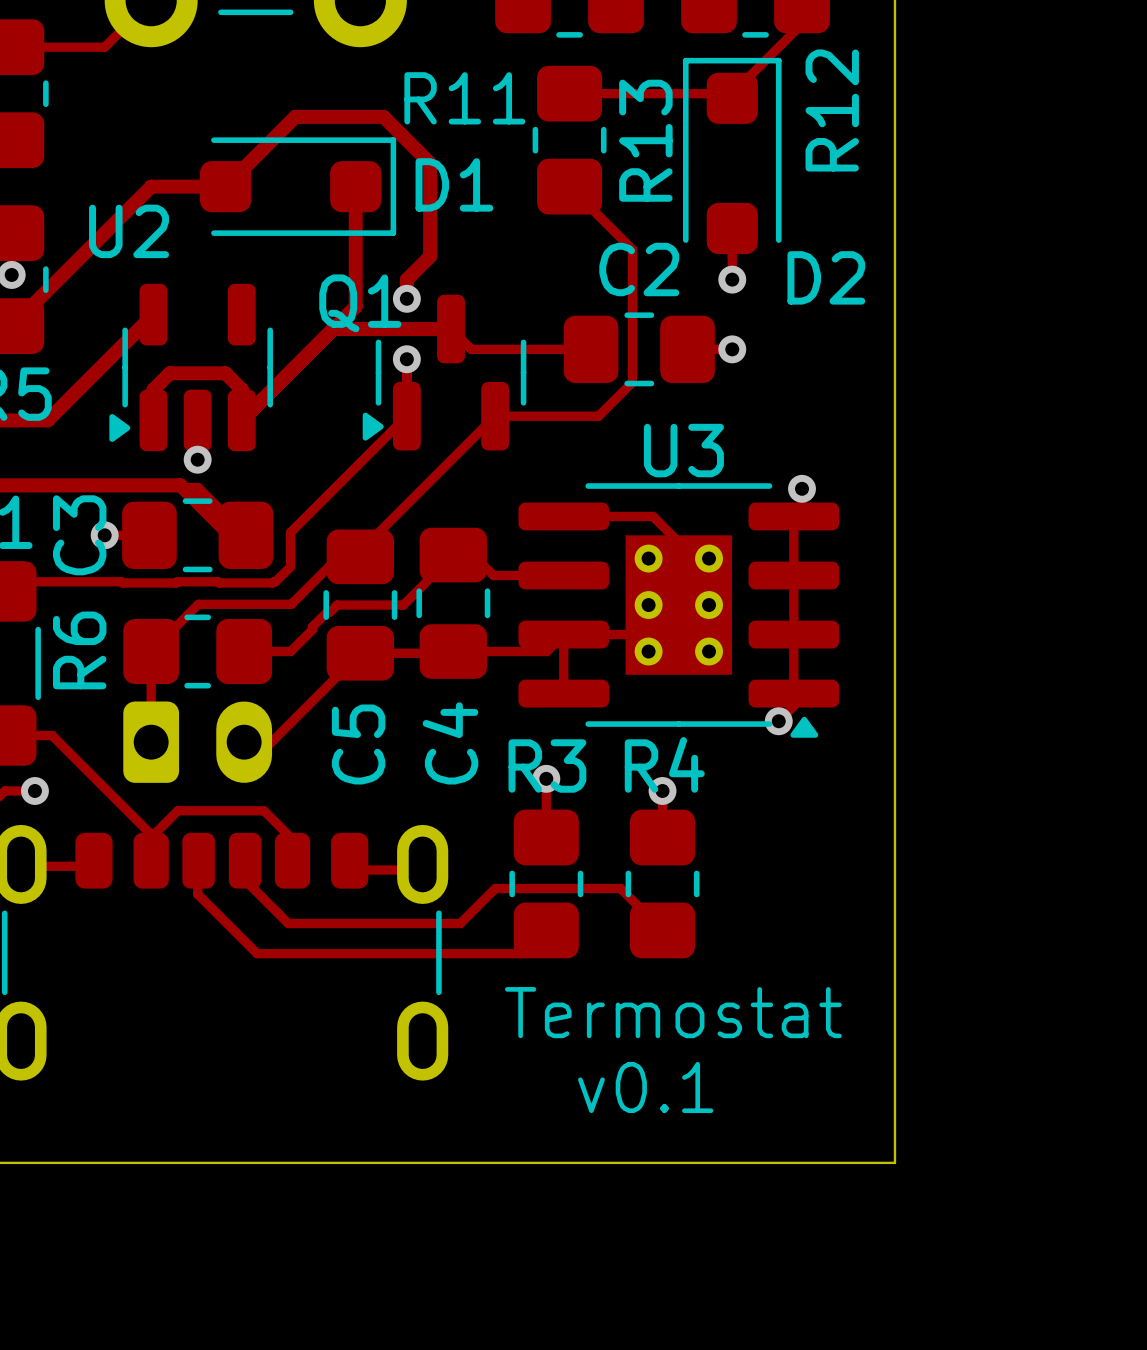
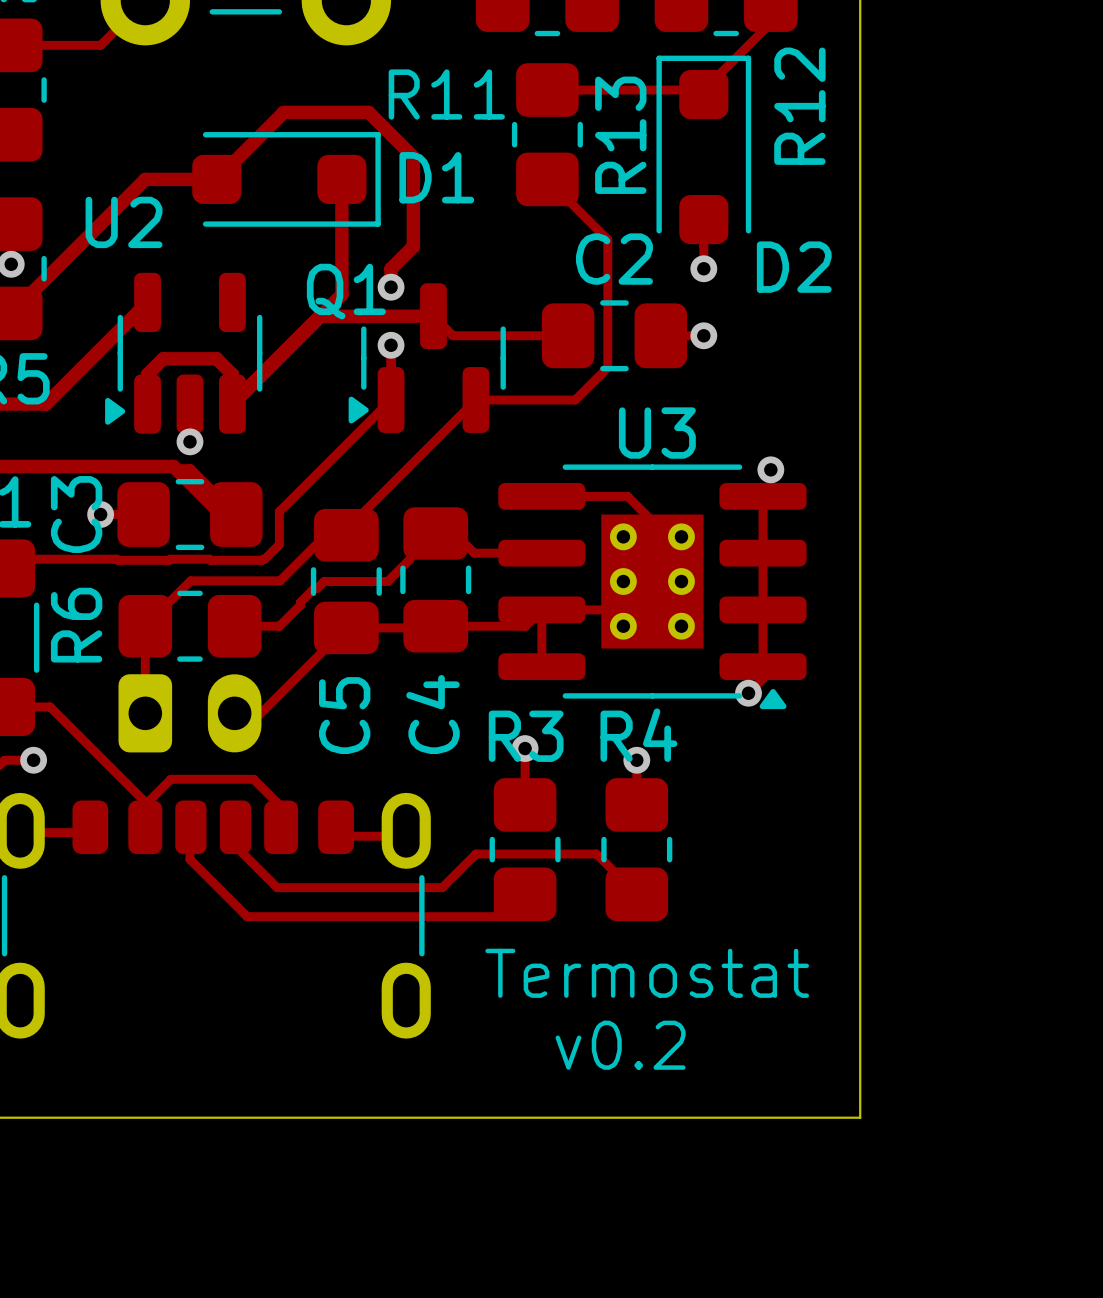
text: v0.1 (645, 1087) -> v0.2 (620, 1045)

